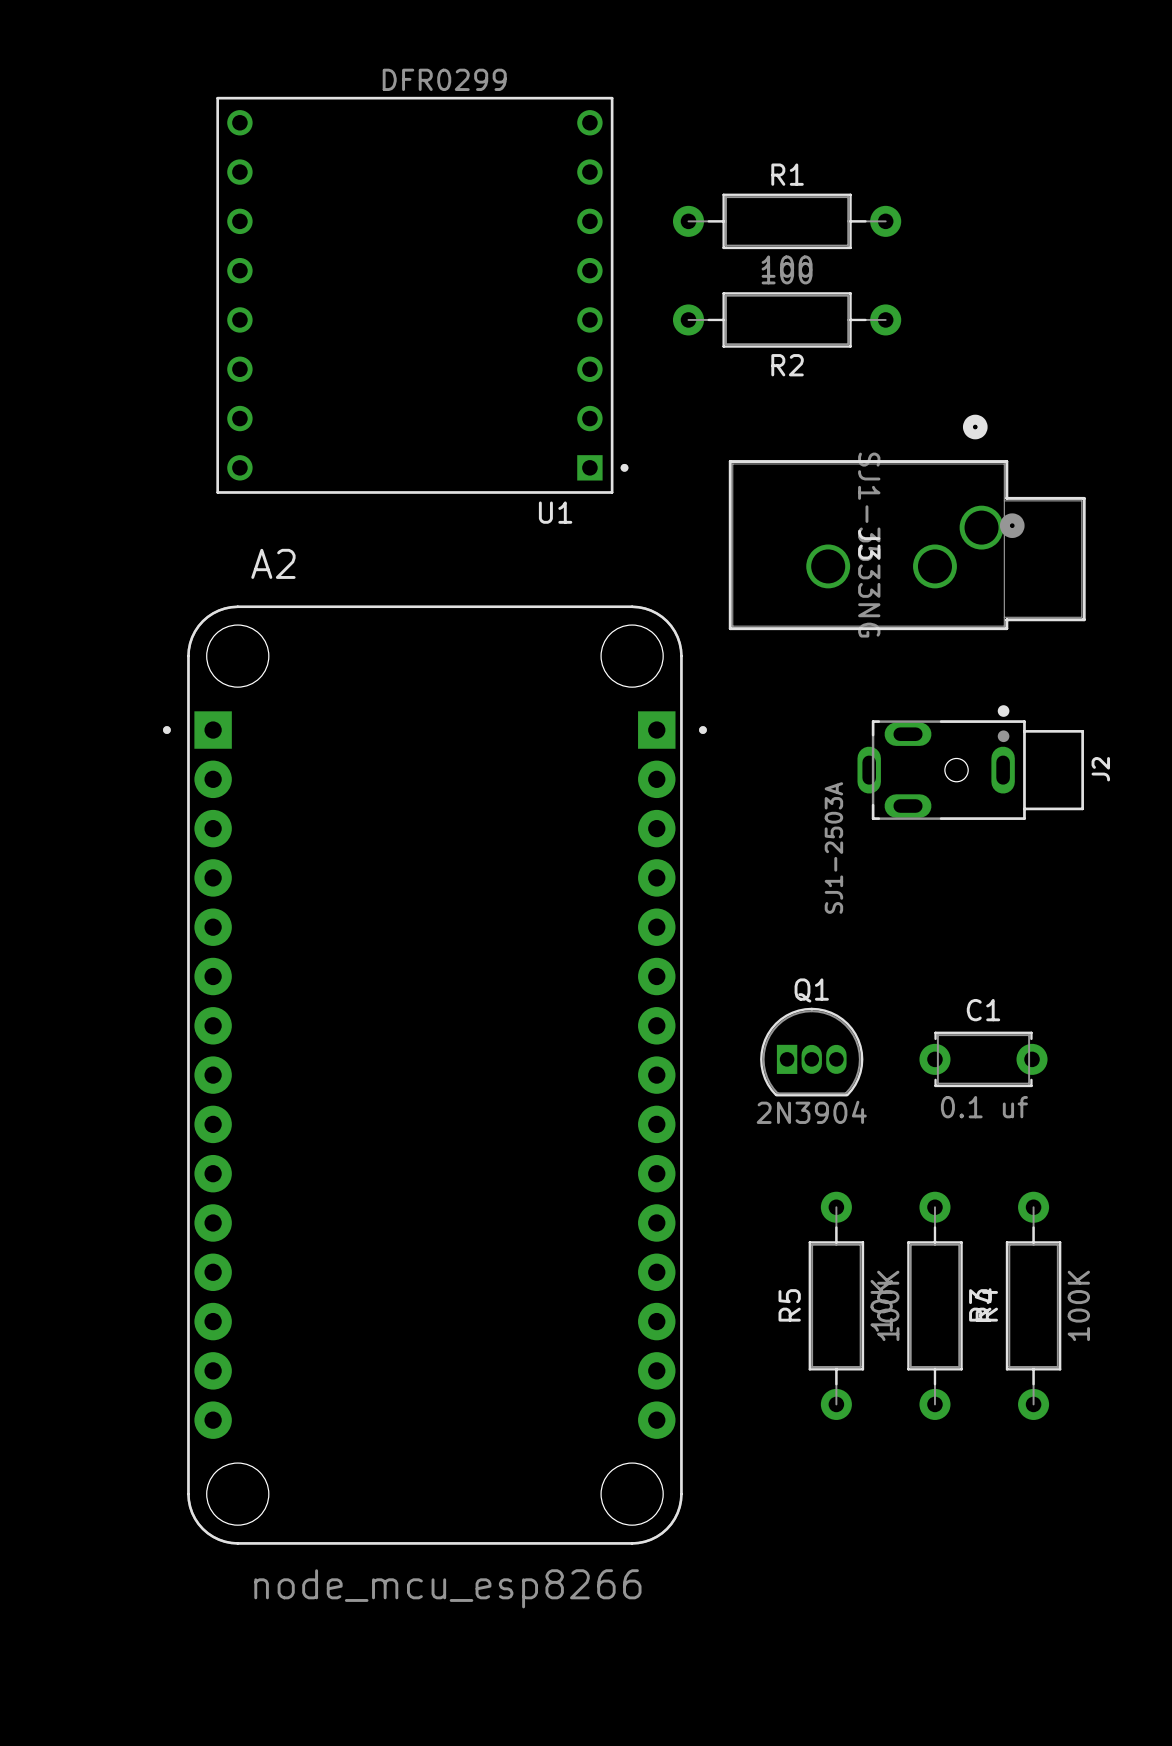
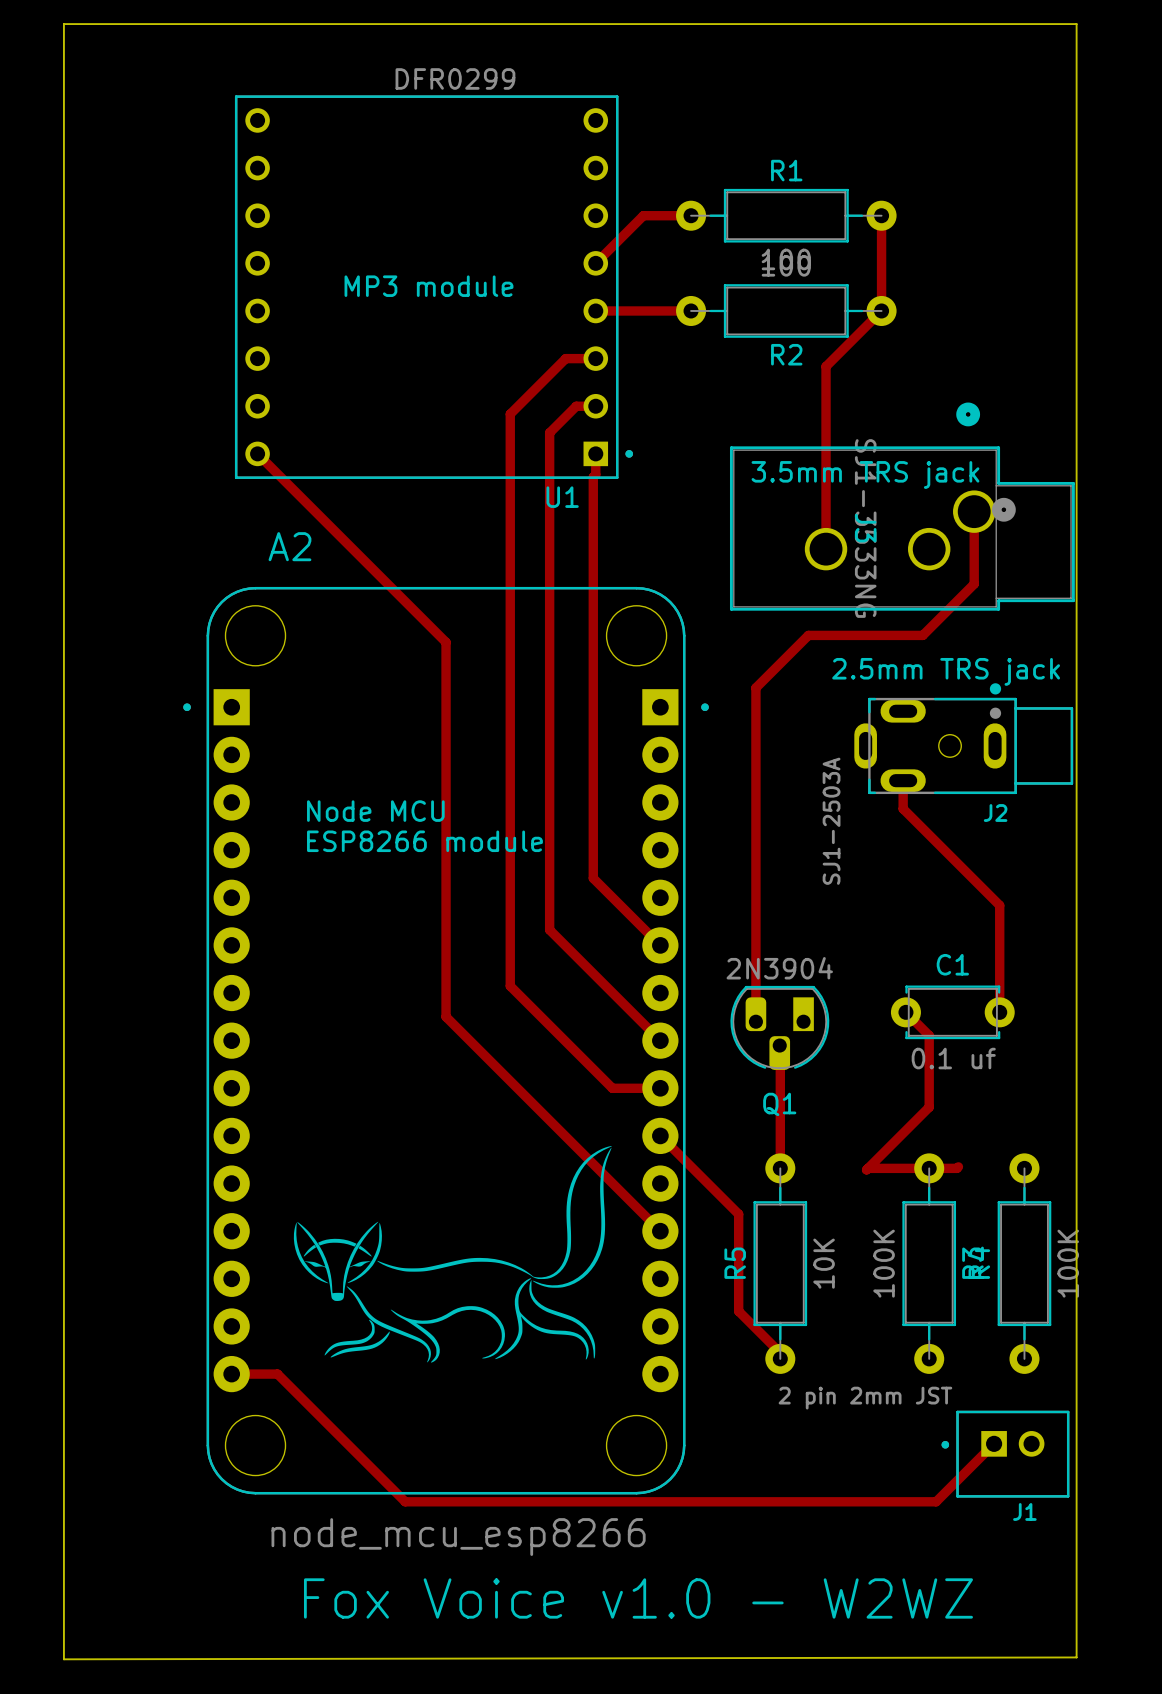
board edge: none -> (63, 24) (63, 1659) (1076, 1657) (1076, 24) (63, 24)
track: none -> (691, 215) (643, 215) (595, 263)
track: none -> (881, 215) (881, 310) (826, 366) (826, 549)
text: none -> MP3 module (428, 286)
track: none -> (595, 310) (691, 310)
track: none -> (595, 358) (565, 358) (510, 414) (510, 986) (612, 1088) (660, 1088)
track: none -> (595, 406) (576, 406) (549, 432) (549, 929) (660, 1040)
track: none -> (257, 453) (446, 642) (446, 1016) (660, 1231)
track: none -> (595, 453) (595, 474) (593, 477) (593, 878) (660, 945)
text: none -> 3.5mm TRS jack (865, 474)
track: none -> (974, 511) (974, 584) (922, 635) (808, 635) (755, 687) (755, 1021)
text: none -> 2.5mm TRS jack (946, 671)
J2 name rotation: 0° (1100, 769) -> 90° clockwise (995, 813)
J2 name position: J2 (1100, 769) -> J2 (995, 813)
track: none -> (903, 780) (903, 808) (999, 905) (999, 1012)
text: none -> Node MCU (375, 811)
text: none -> ESP8266 module (424, 841)
Q1 name position: Q1 (811, 990) -> Q1 (779, 1104)
Q1 footprint: [760, 1007, 864, 1097] -> [730, 985, 830, 1070]
track: none -> (905, 1012) (929, 1035) (929, 1107) (866, 1169)
C1 position: (983, 1059) -> (952, 1012)
track: none -> (779, 1045) (780, 1168)
Q1 value position: 2N3904 (811, 1112) -> 2N3904 (779, 968)
track: none -> (660, 1135) (738, 1214) (738, 1311) (780, 1352) (780, 1358)
drawing: none -> [293, 1146, 612, 1363]
track: none -> (958, 1166) (868, 1168)
R5 position: (836, 1305) -> (780, 1263)
track: none -> (231, 1374) (277, 1374) (405, 1501) (936, 1501) (994, 1443)
J1: none -> 2 pin 2mm JST (1005, 1454)
text: none -> Fox Voice v1.0 - W2WZ (638, 1598)

